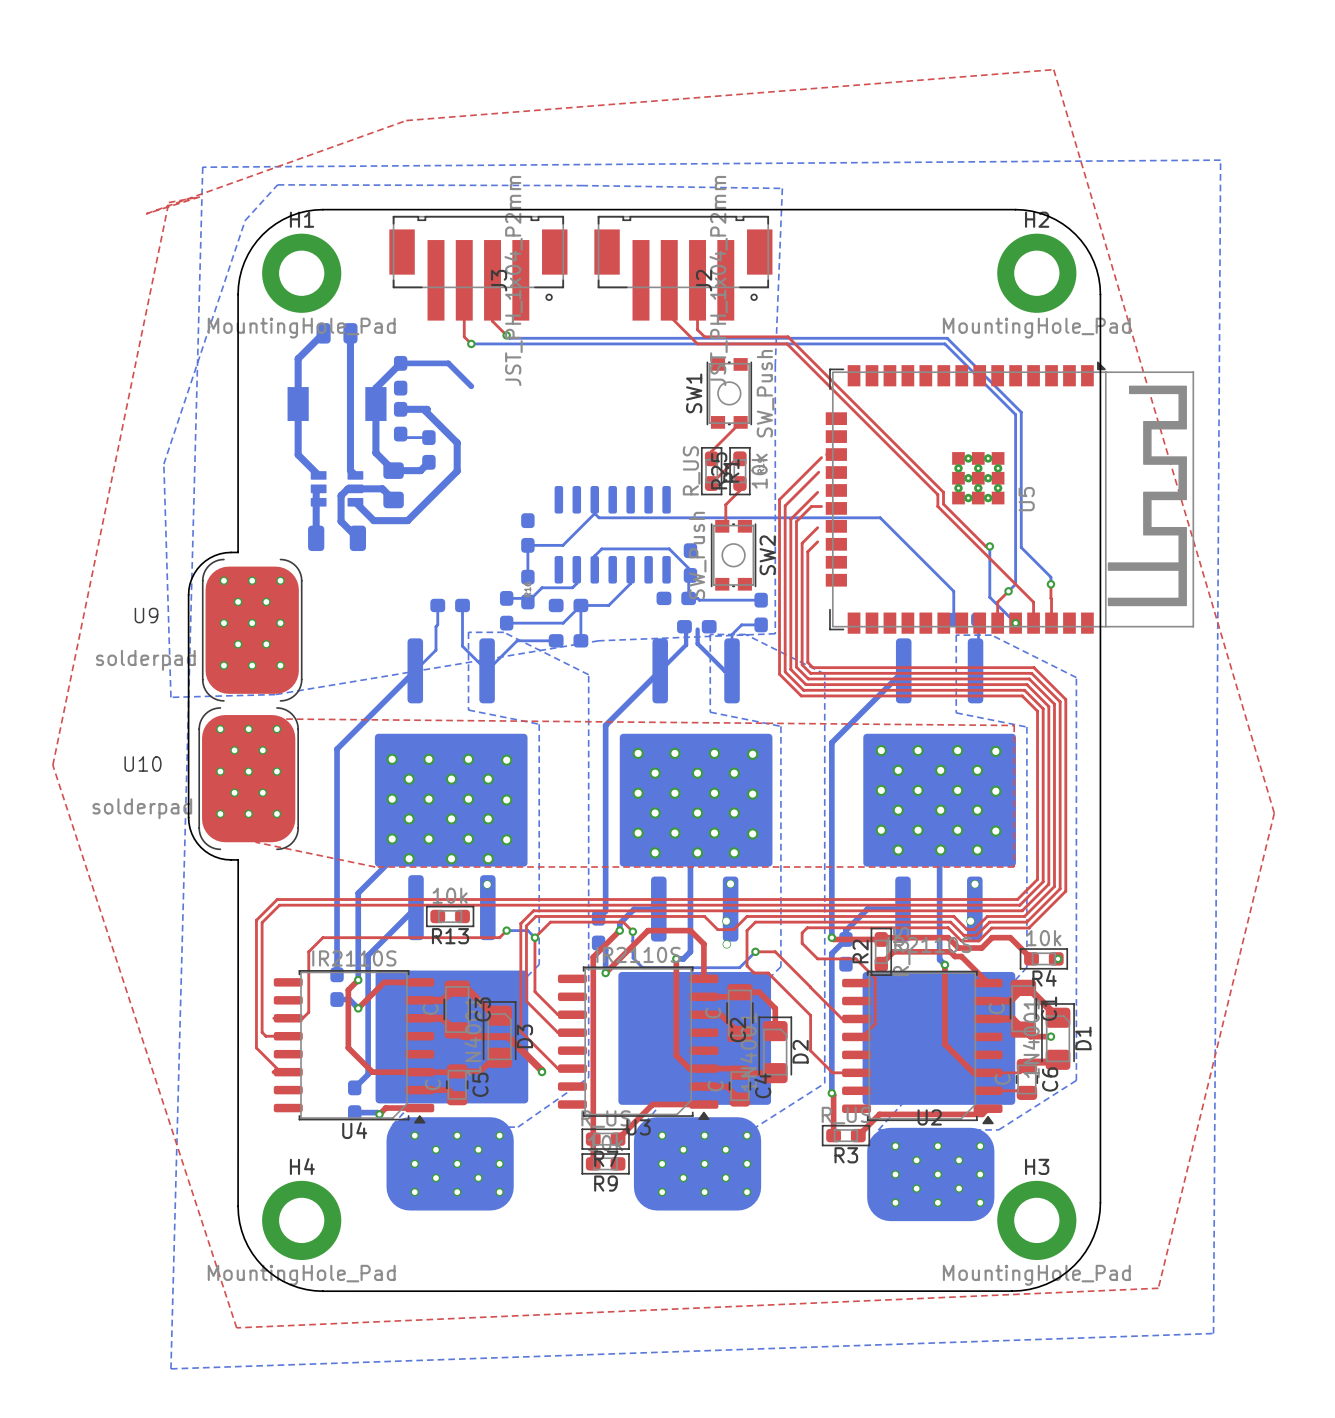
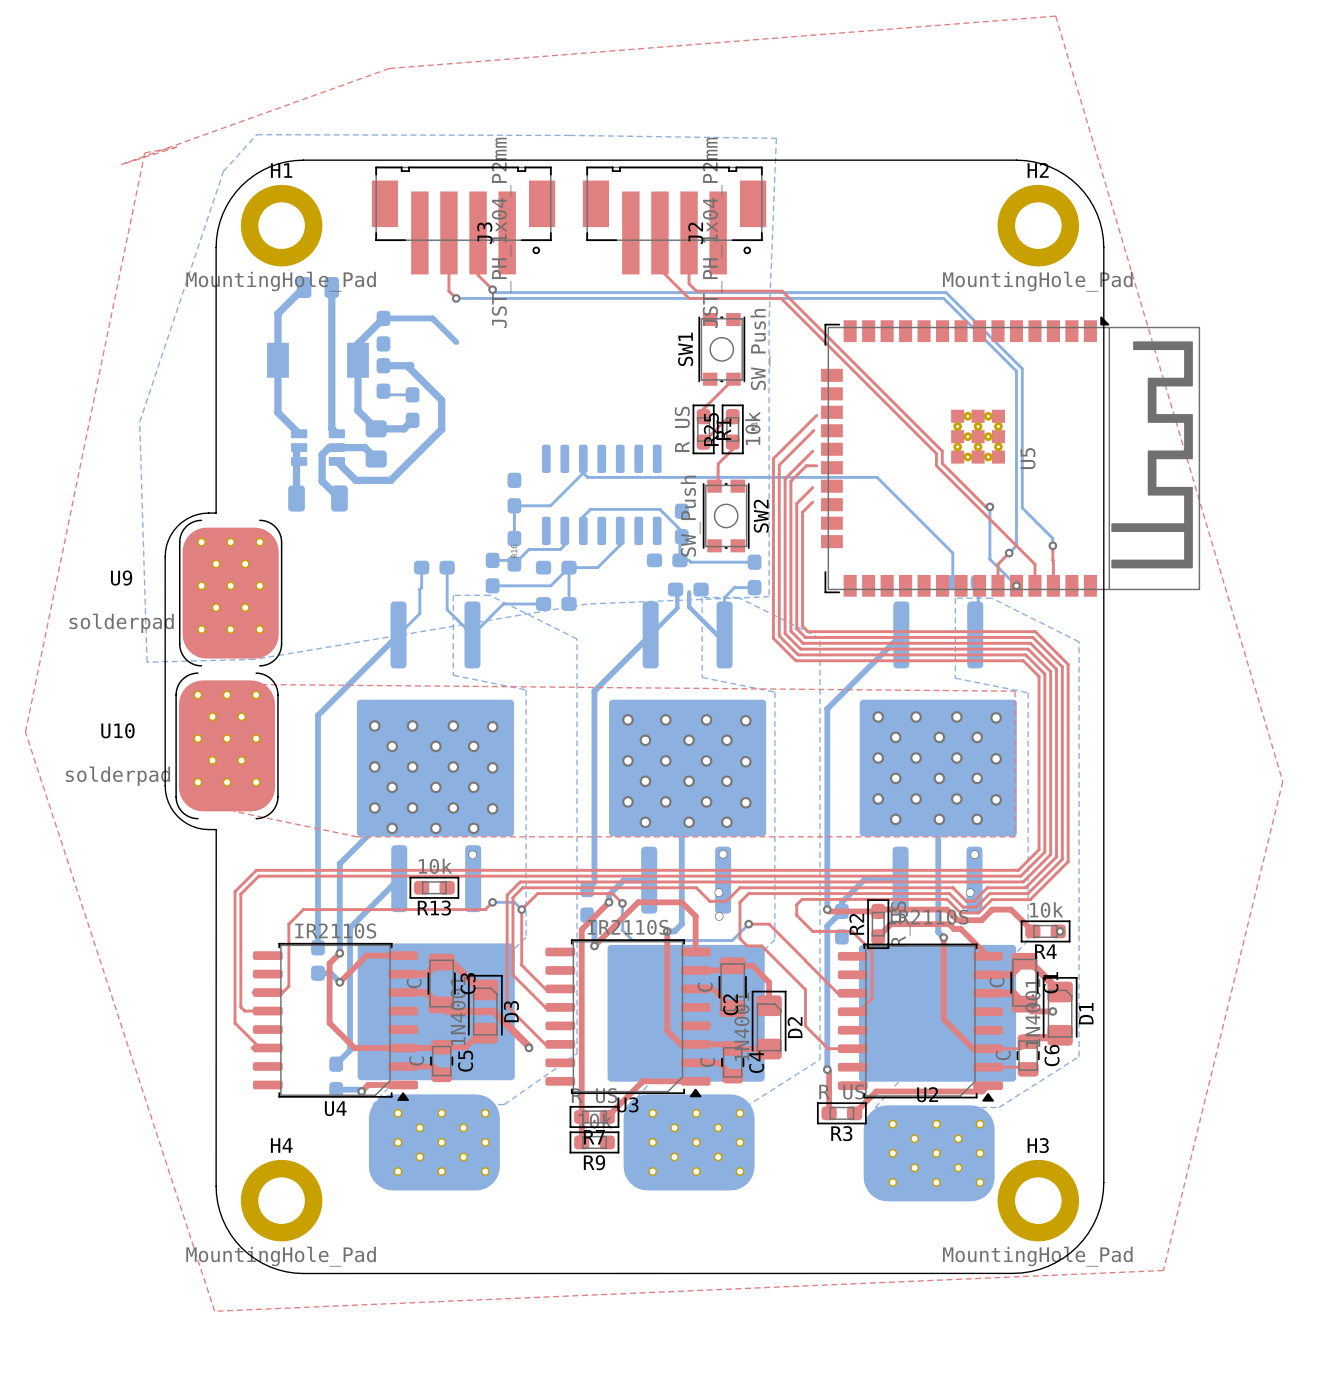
bottom zone outline: (1220, 160) (1213, 1333) (170, 1368) (202, 167) (1220, 160) -> none

